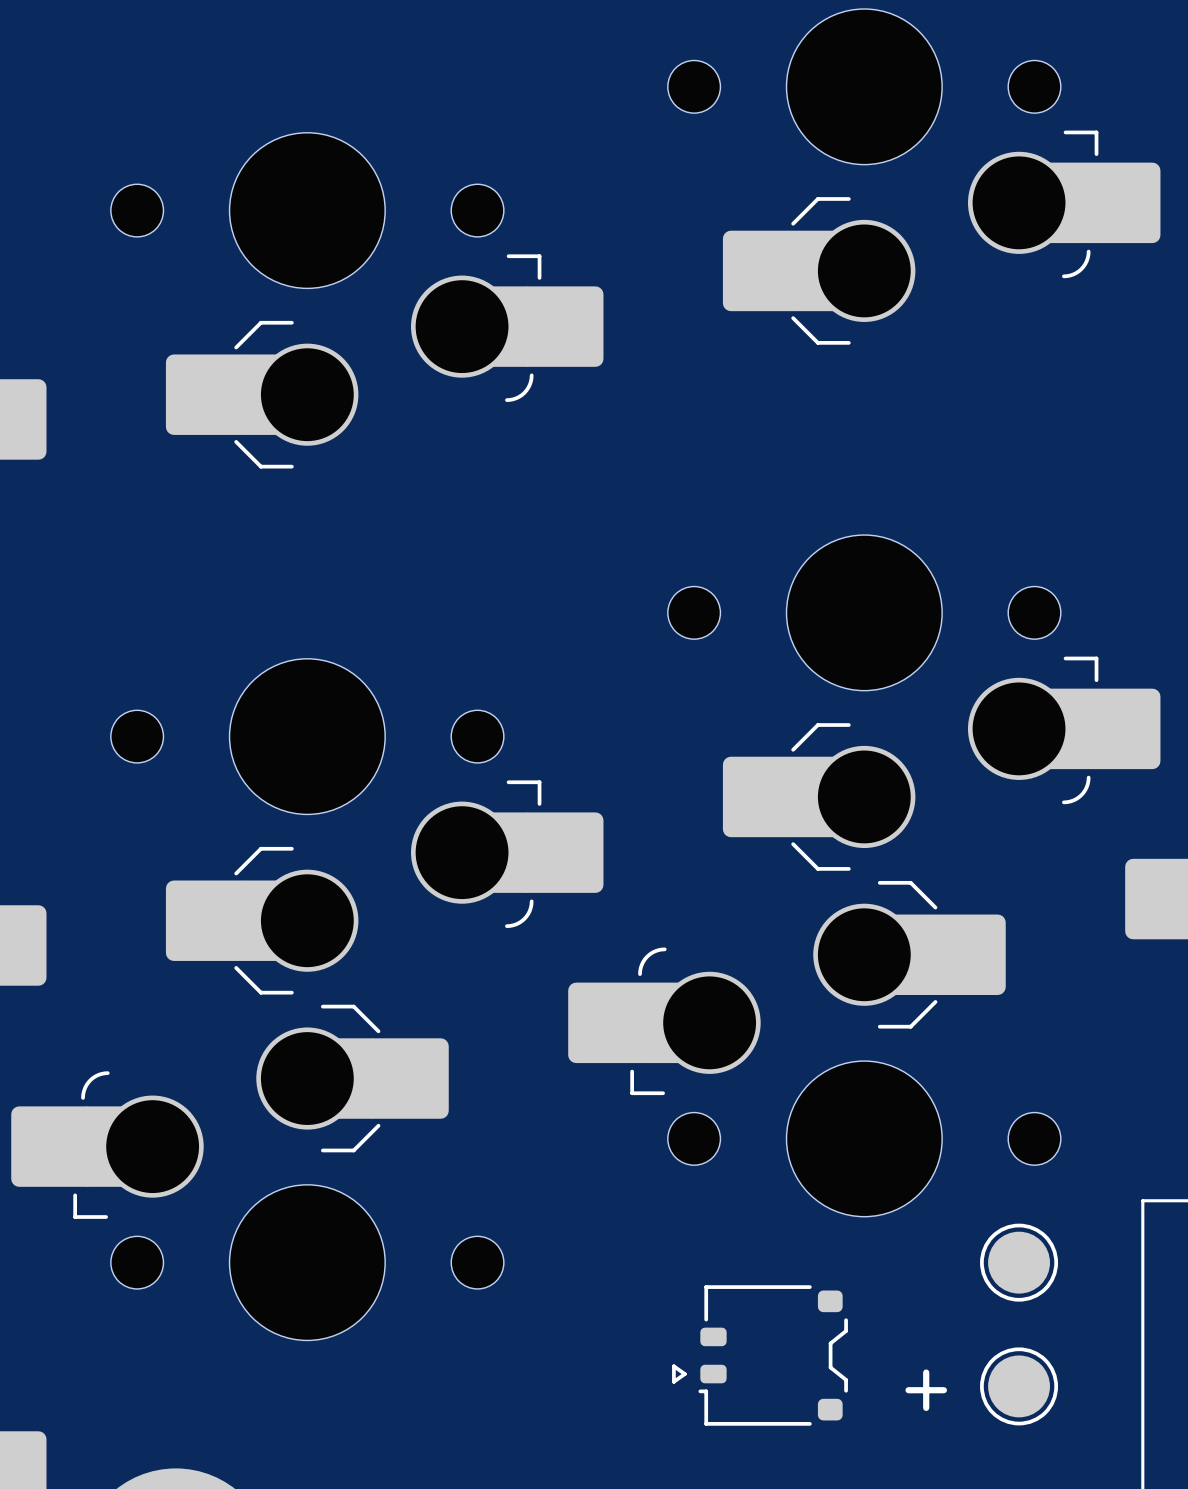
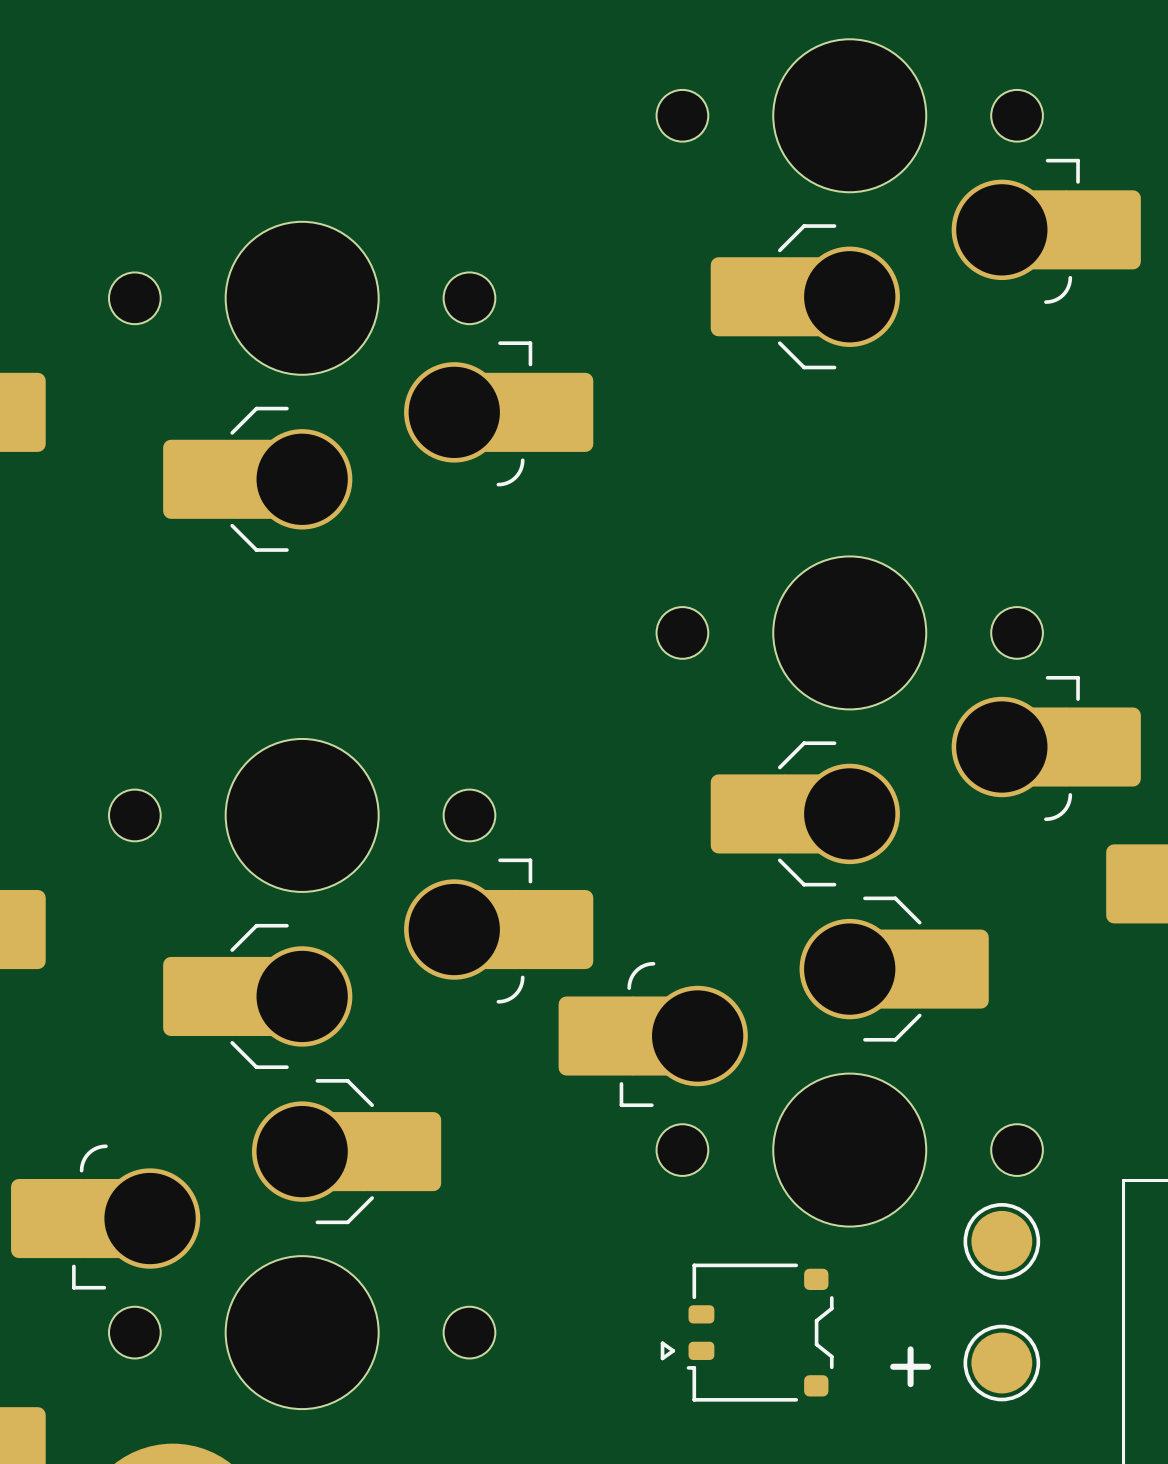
part position: (914, 176) -> (898, 204)
part position: (357, 300) -> (351, 386)
part position: (914, 702) -> (898, 721)
part position: (357, 826) -> (351, 903)
part position: (814, 1048) -> (800, 1061)
part position: (257, 1172) -> (253, 1244)

